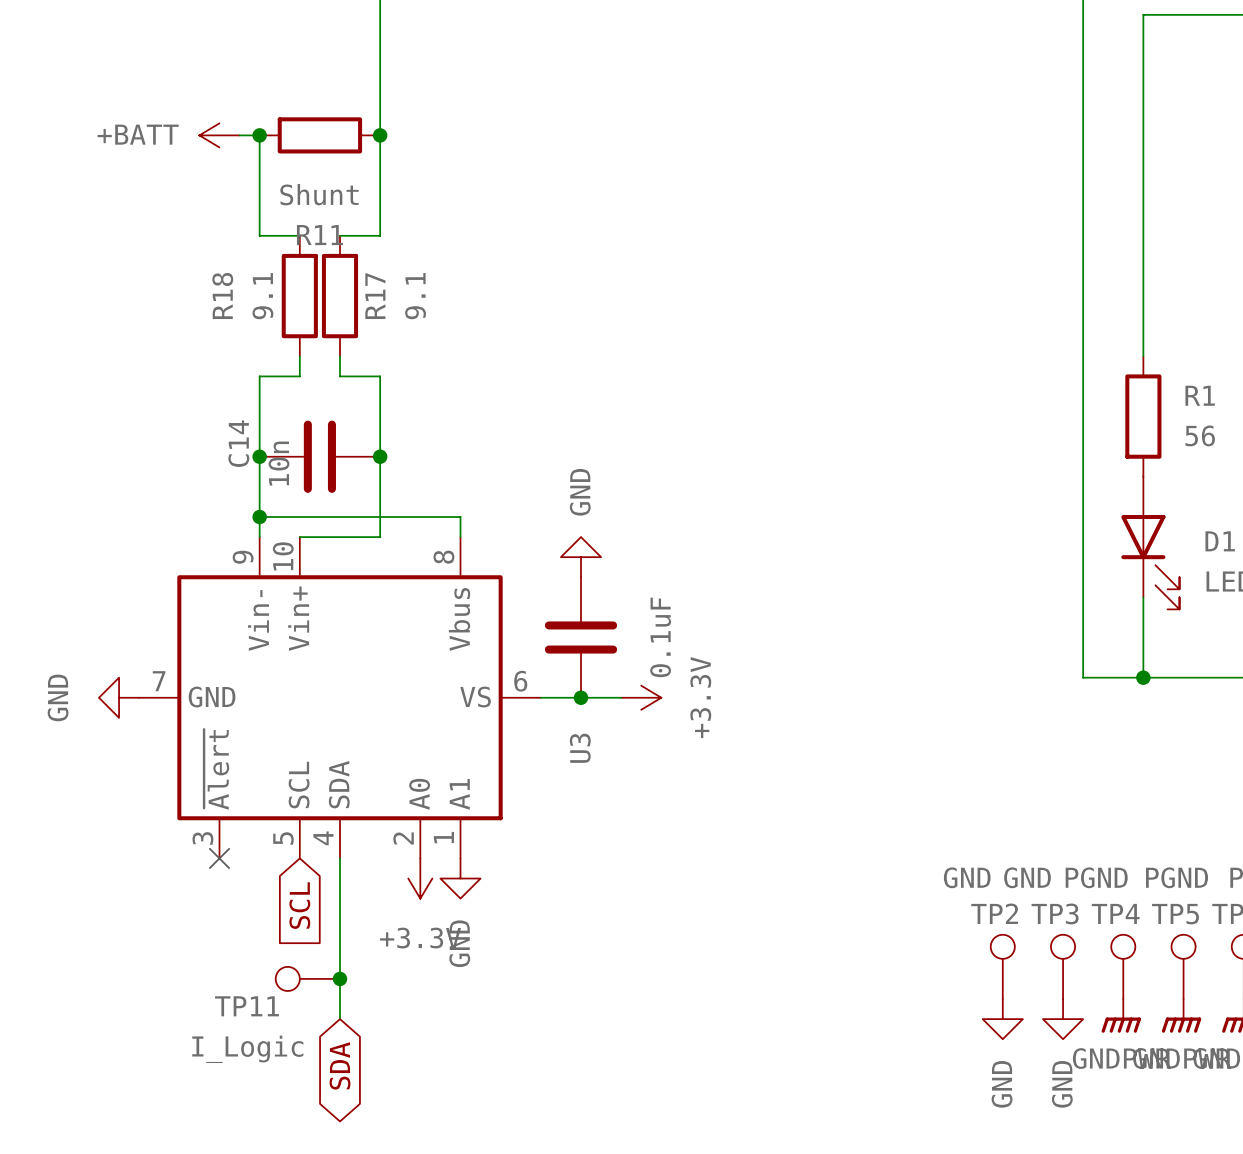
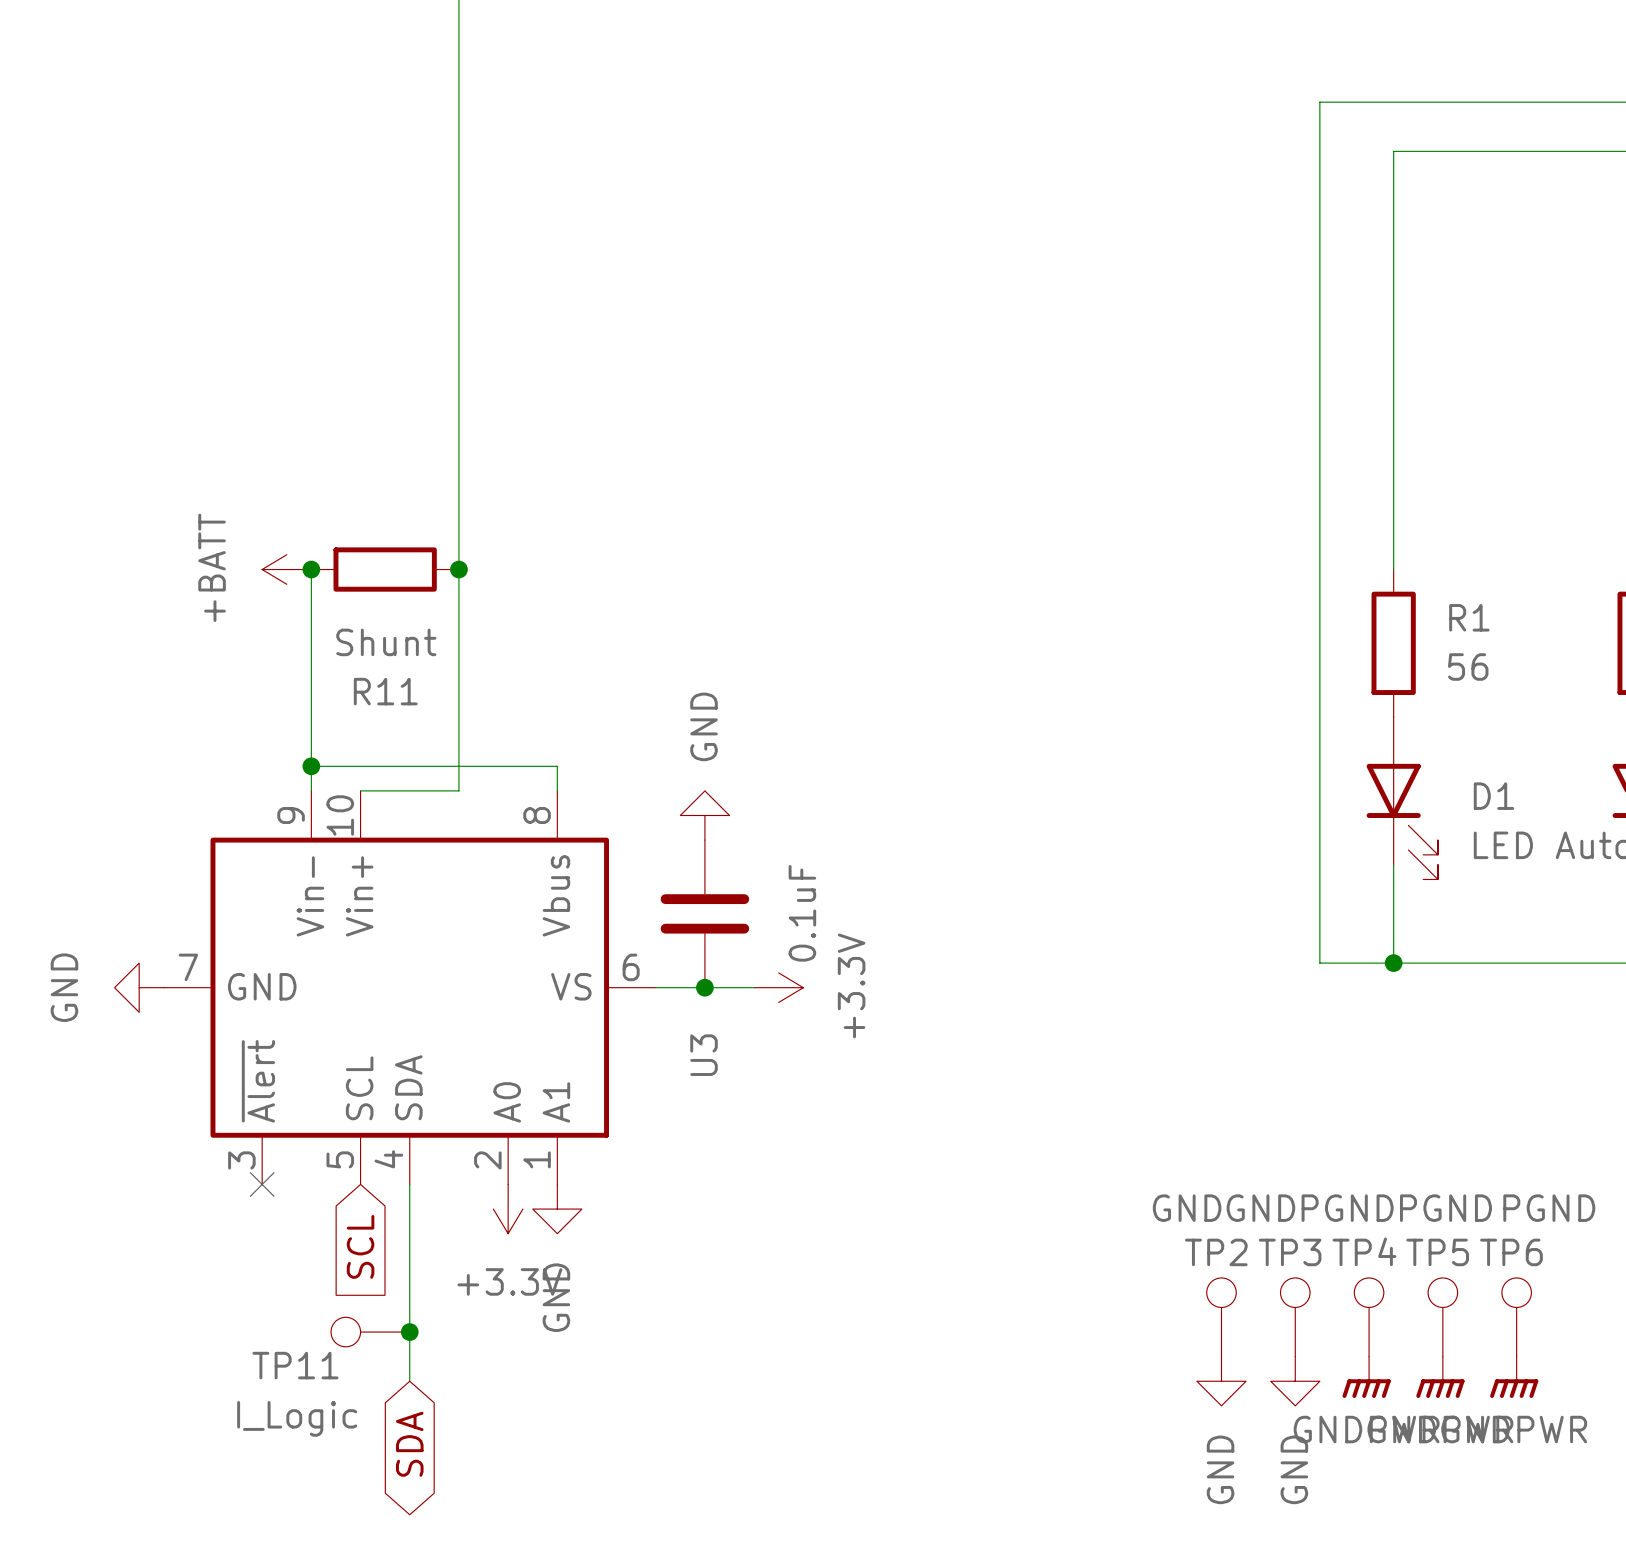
power symbol text rotation: 0° (138, 134) -> 90° counterclockwise (212, 567)
power symbol position: +BATT (219, 135) -> +BATT (286, 569)
wire: (239, 135) (259, 135) (259, 235) (299, 235) -> none
junction: (259, 135) -> none
R11 position: (319, 135) -> (385, 569)
junction: (380, 135) -> none
wire: (339, 235) (380, 235) -> none
R18: 9.1 (299, 296) -> none
R17: 9.1 (339, 296) -> none
junction: none -> (311, 569)
wire: (299, 356) (299, 376) (259, 376) -> (311, 569) (311, 594)
wire: (339, 356) (339, 376) (380, 376) -> (458, 421) (458, 594)
junction: none -> (458, 569)
junction: (259, 456) -> none
C14: 10n (319, 456) -> none
junction: (380, 456) -> none

